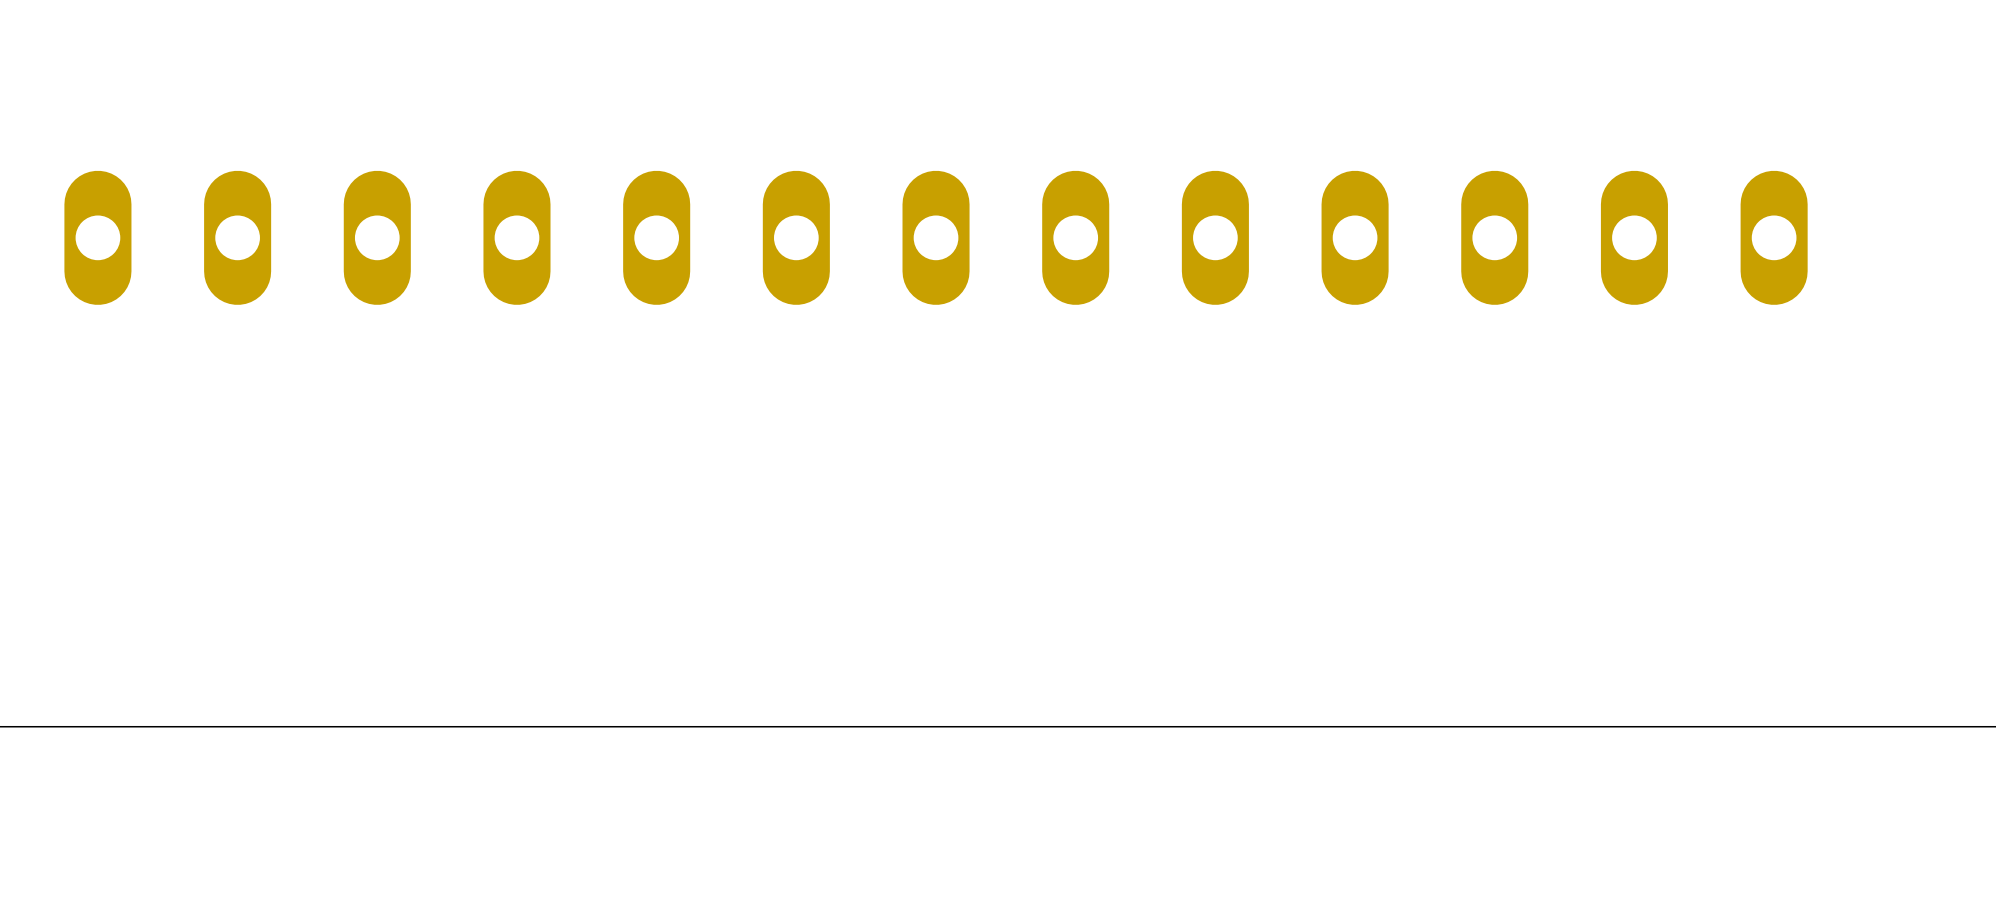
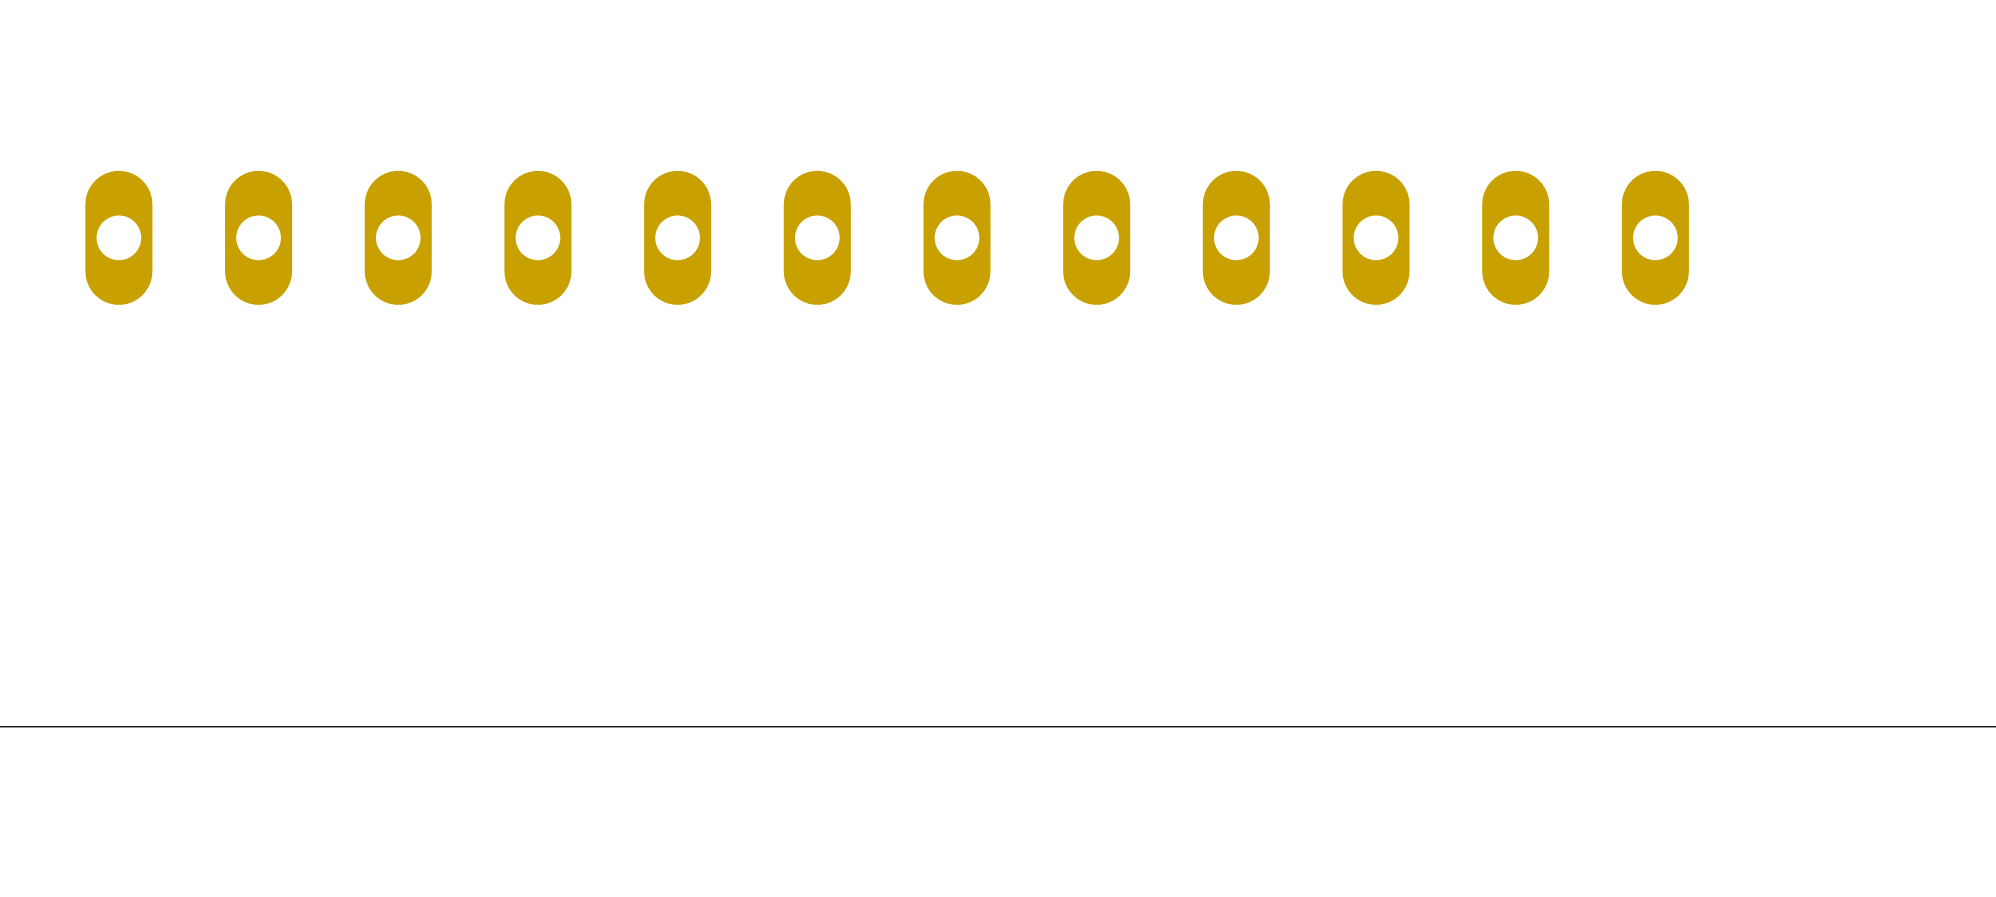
part footprint: [64, 170, 1808, 305] -> [85, 170, 1689, 305]

